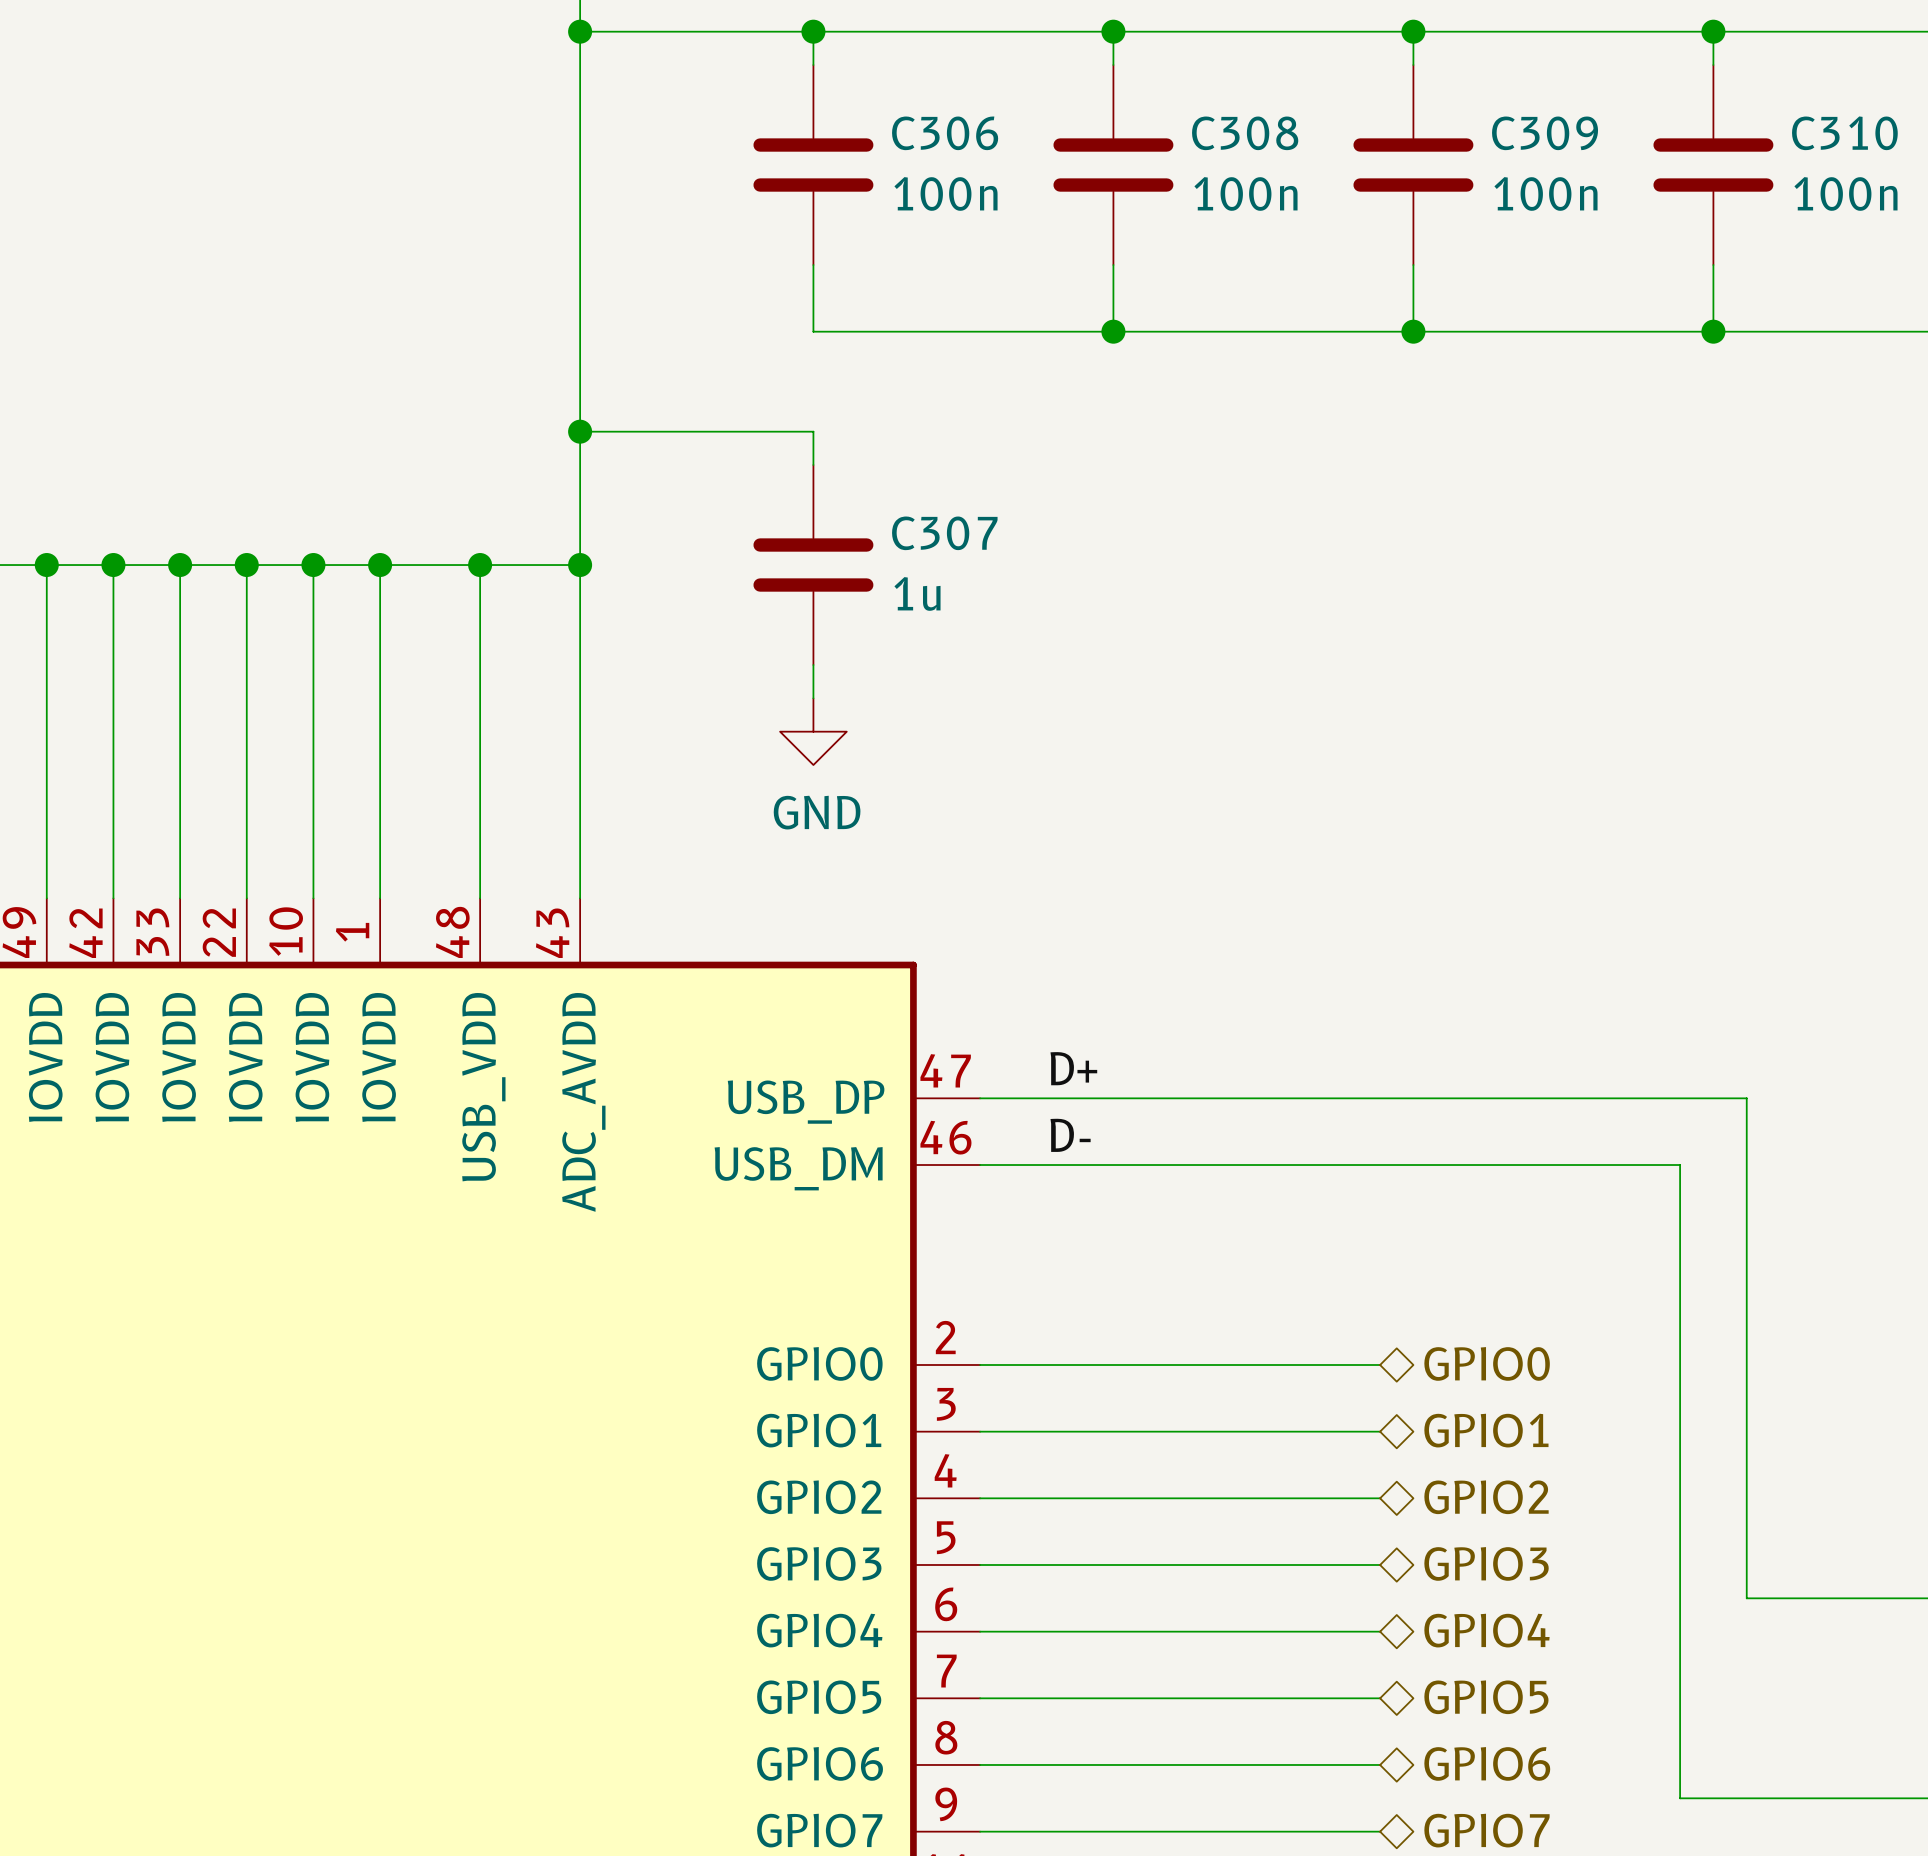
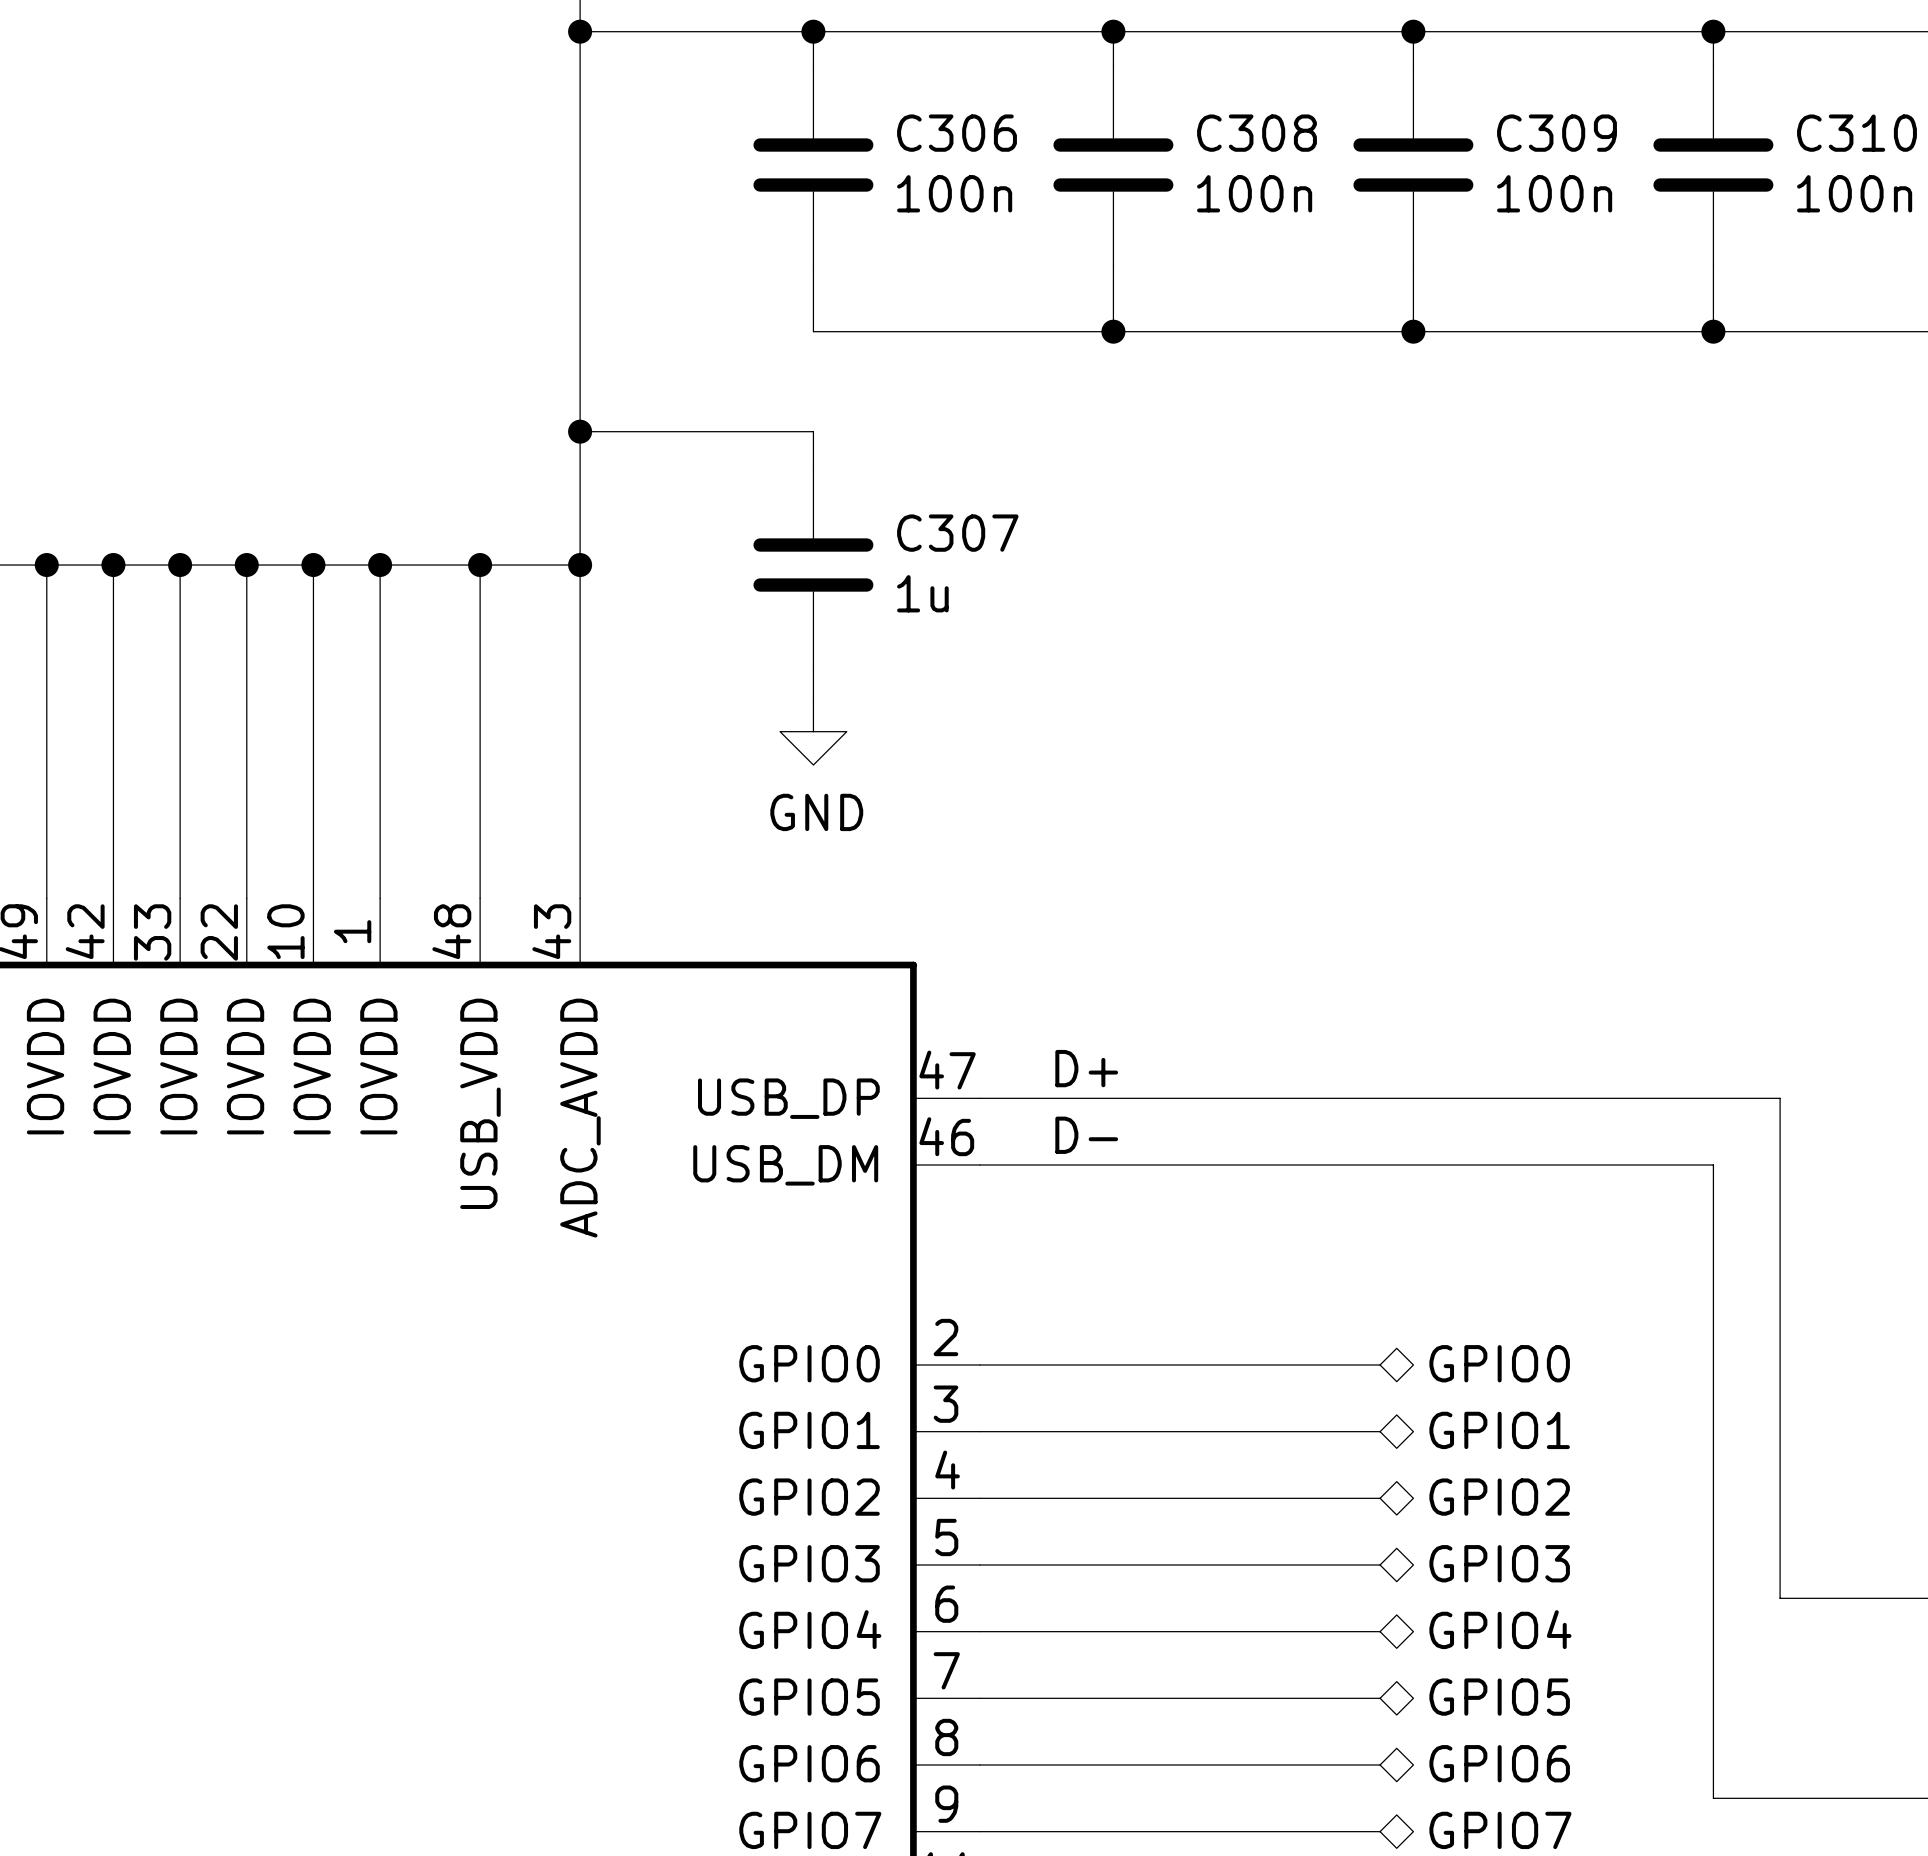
wire: (1746, 1098) (1746, 1598) (1780, 1598) -> (1746, 1098) (1780, 1098) (1780, 1598)
wire: (1680, 1165) (1680, 1798) (1713, 1798) -> (1680, 1165) (1713, 1165) (1713, 1798)

